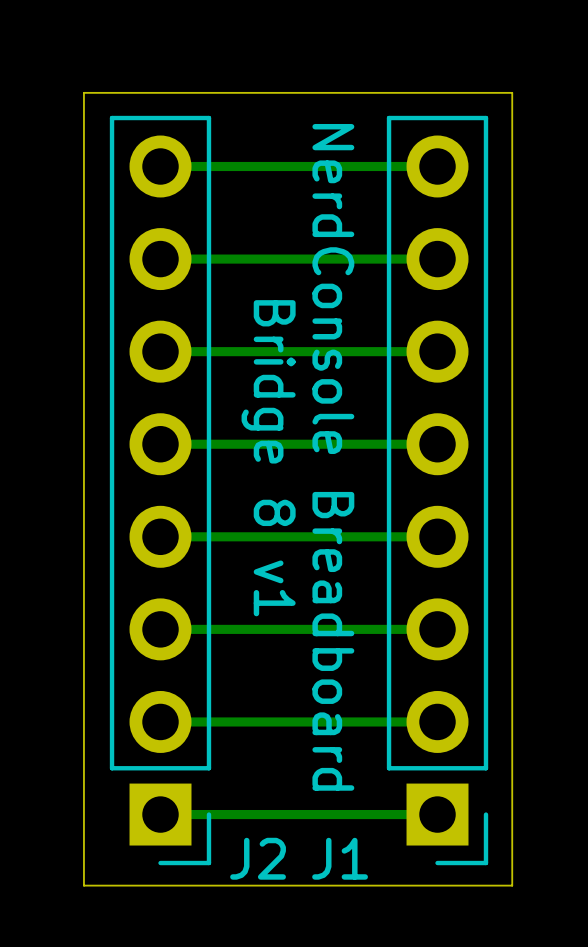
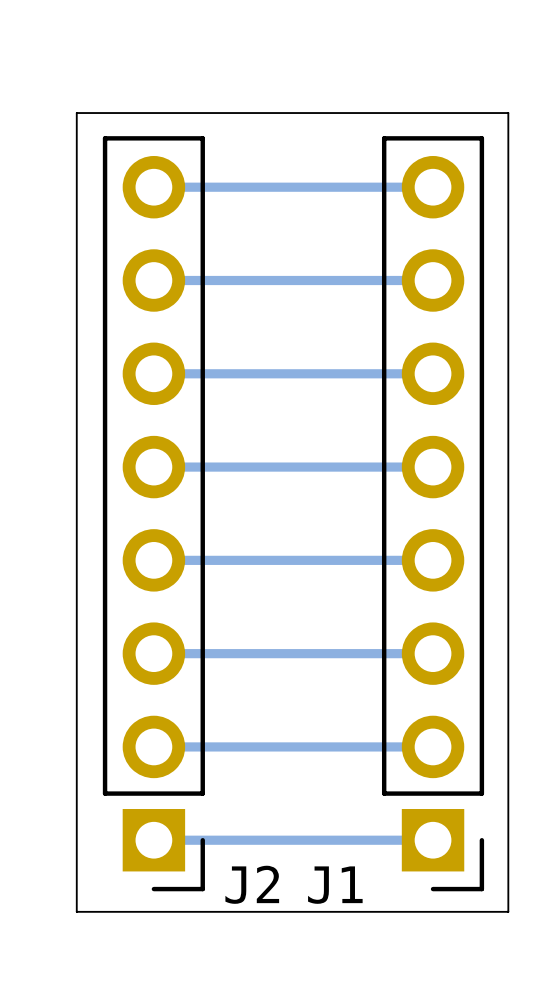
text: NerdConsole Breadboard (333, 457) -> none
text: Bridge 8 v1 (268, 458) -> none

